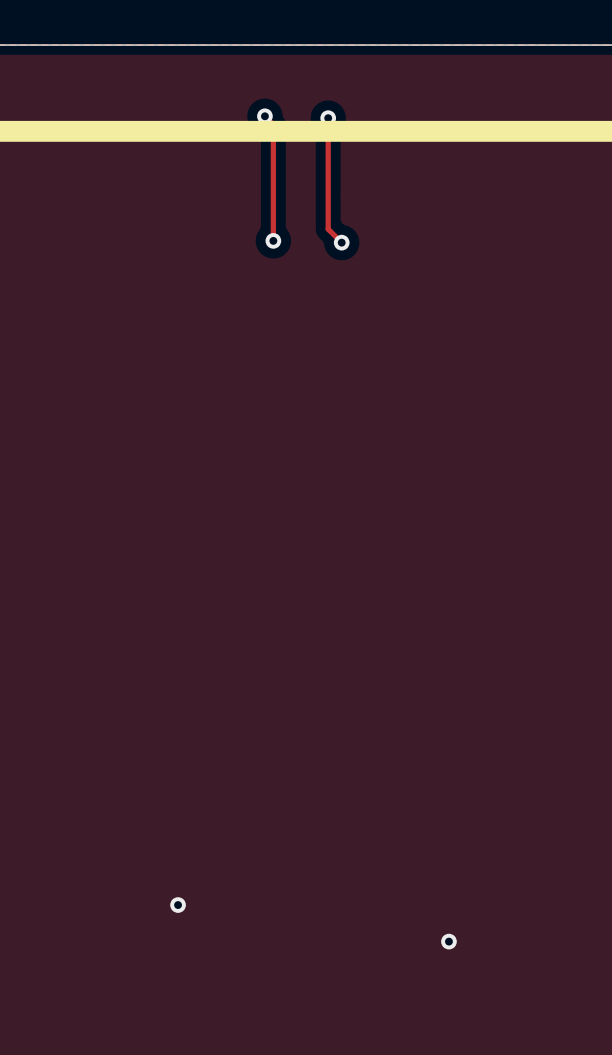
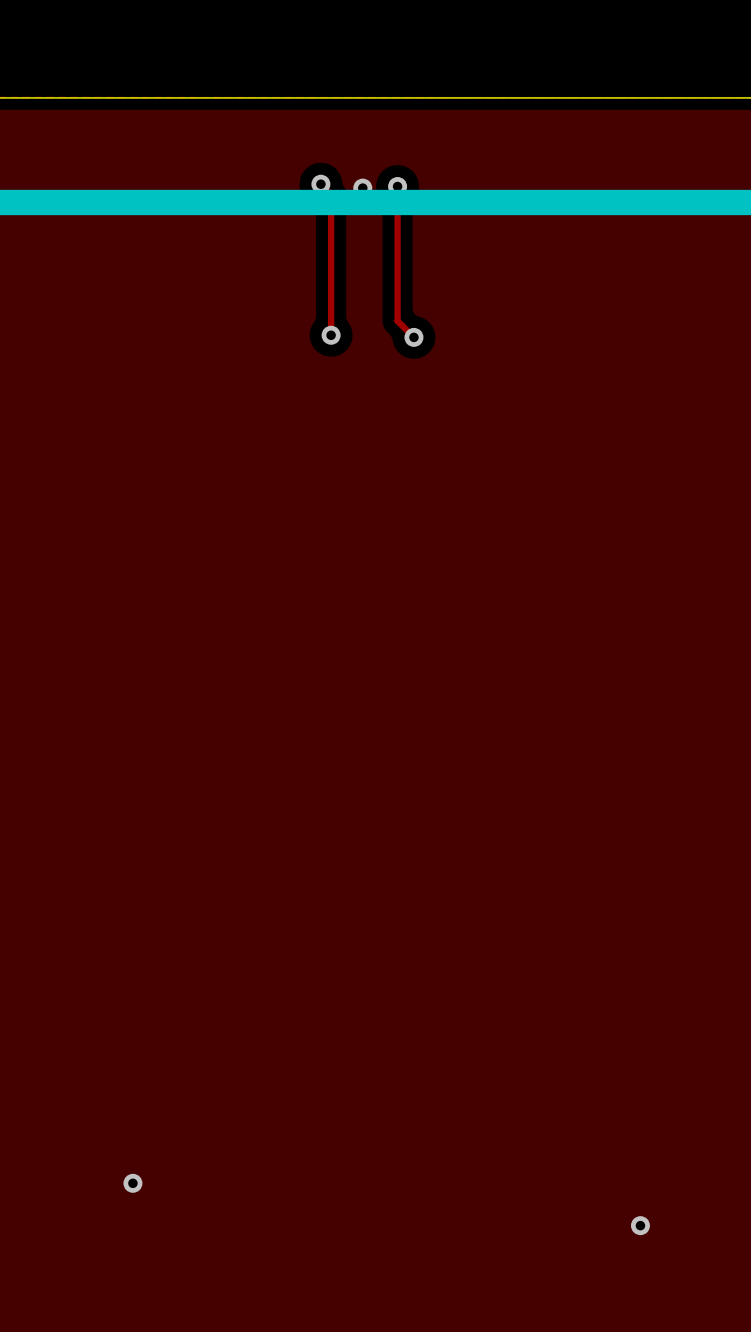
via: none -> (362, 188)
via position: (178, 905) -> (132, 1183)
via position: (448, 941) -> (640, 1225)

